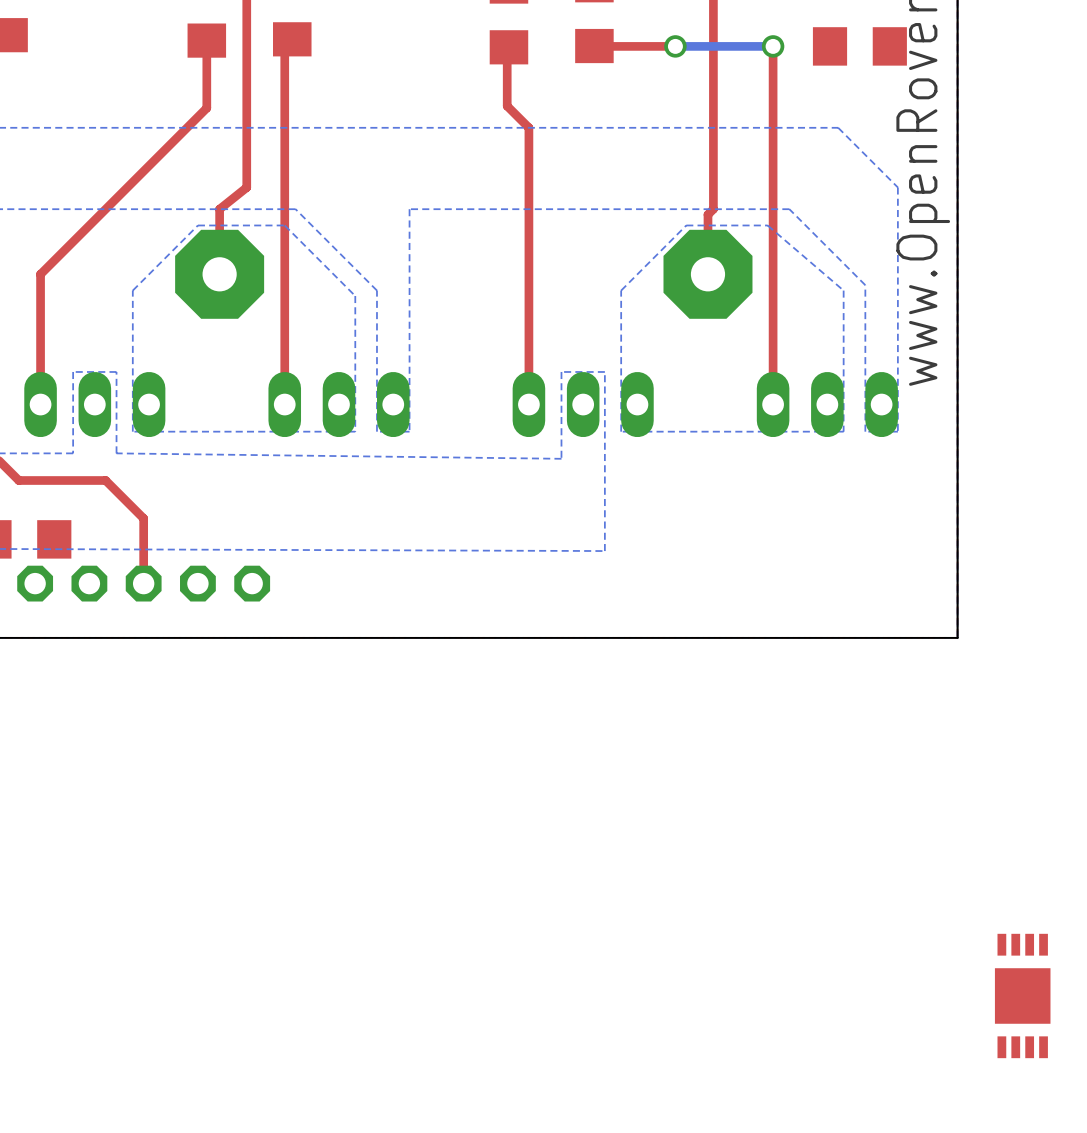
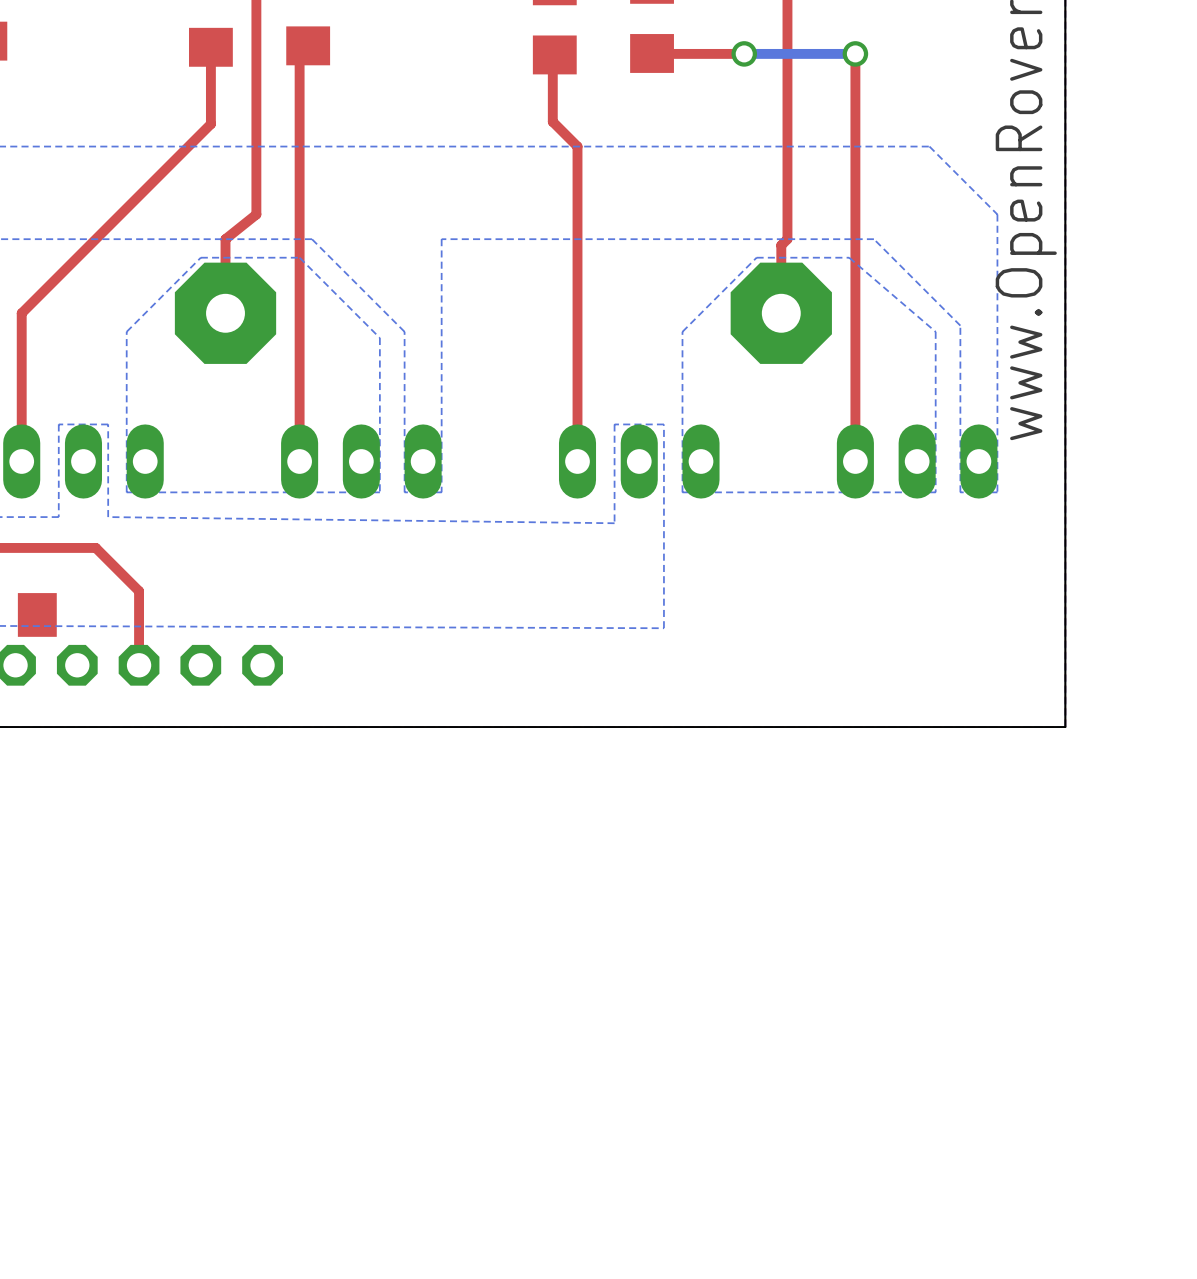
part: (859, 46) -> none
part: (1022, 995) -> none

